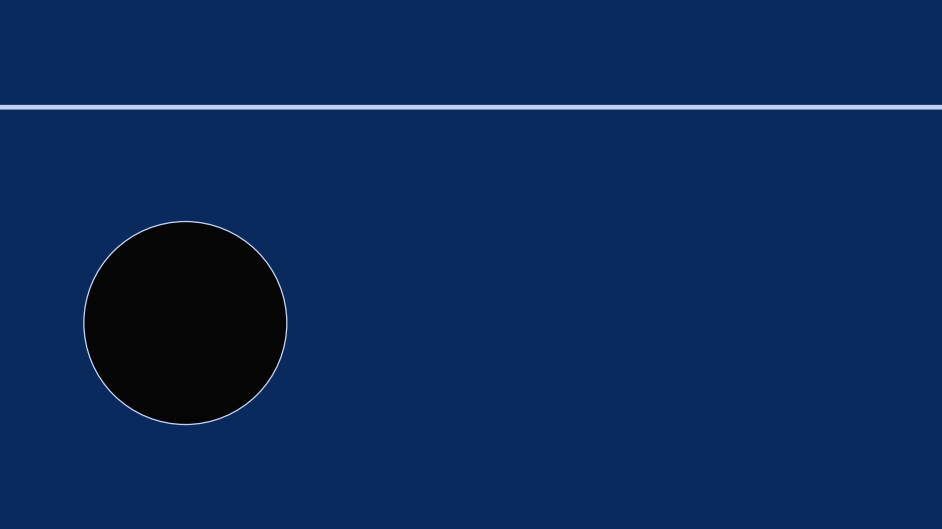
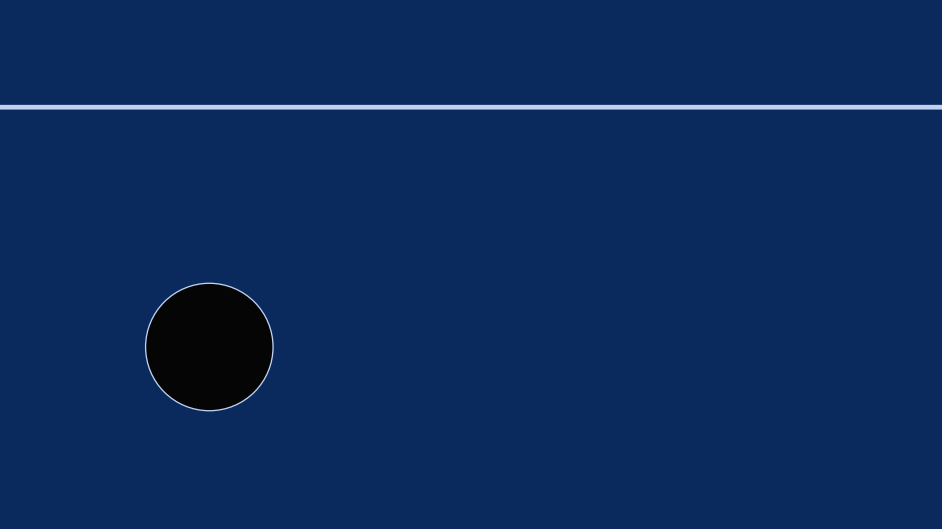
part footprint: [83, 221, 287, 425] -> [145, 283, 274, 411]

